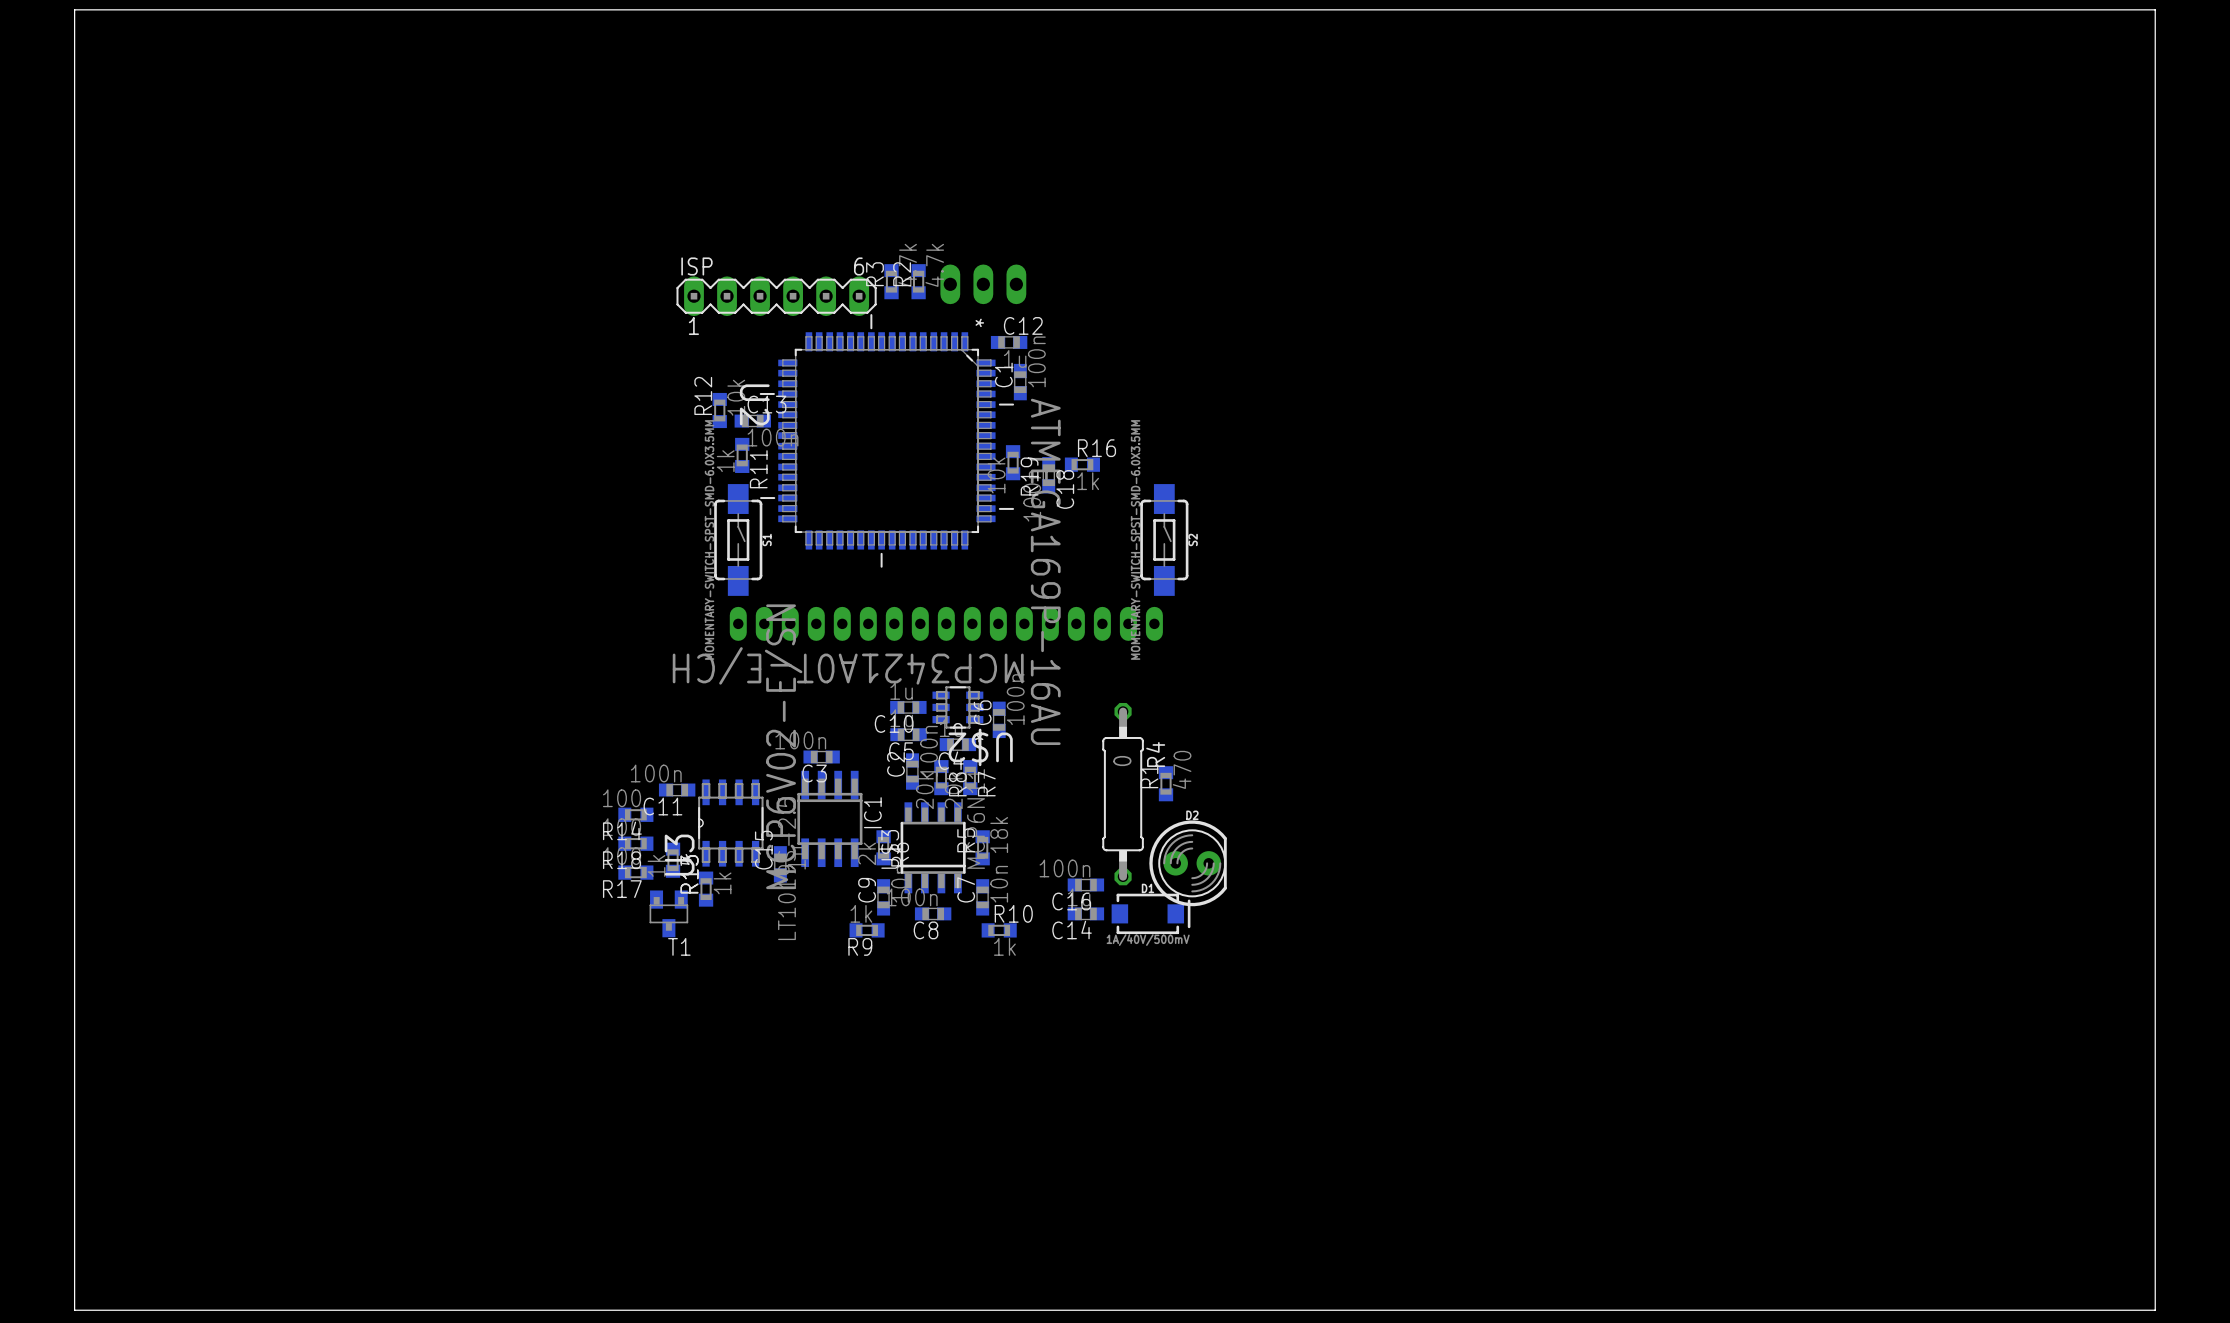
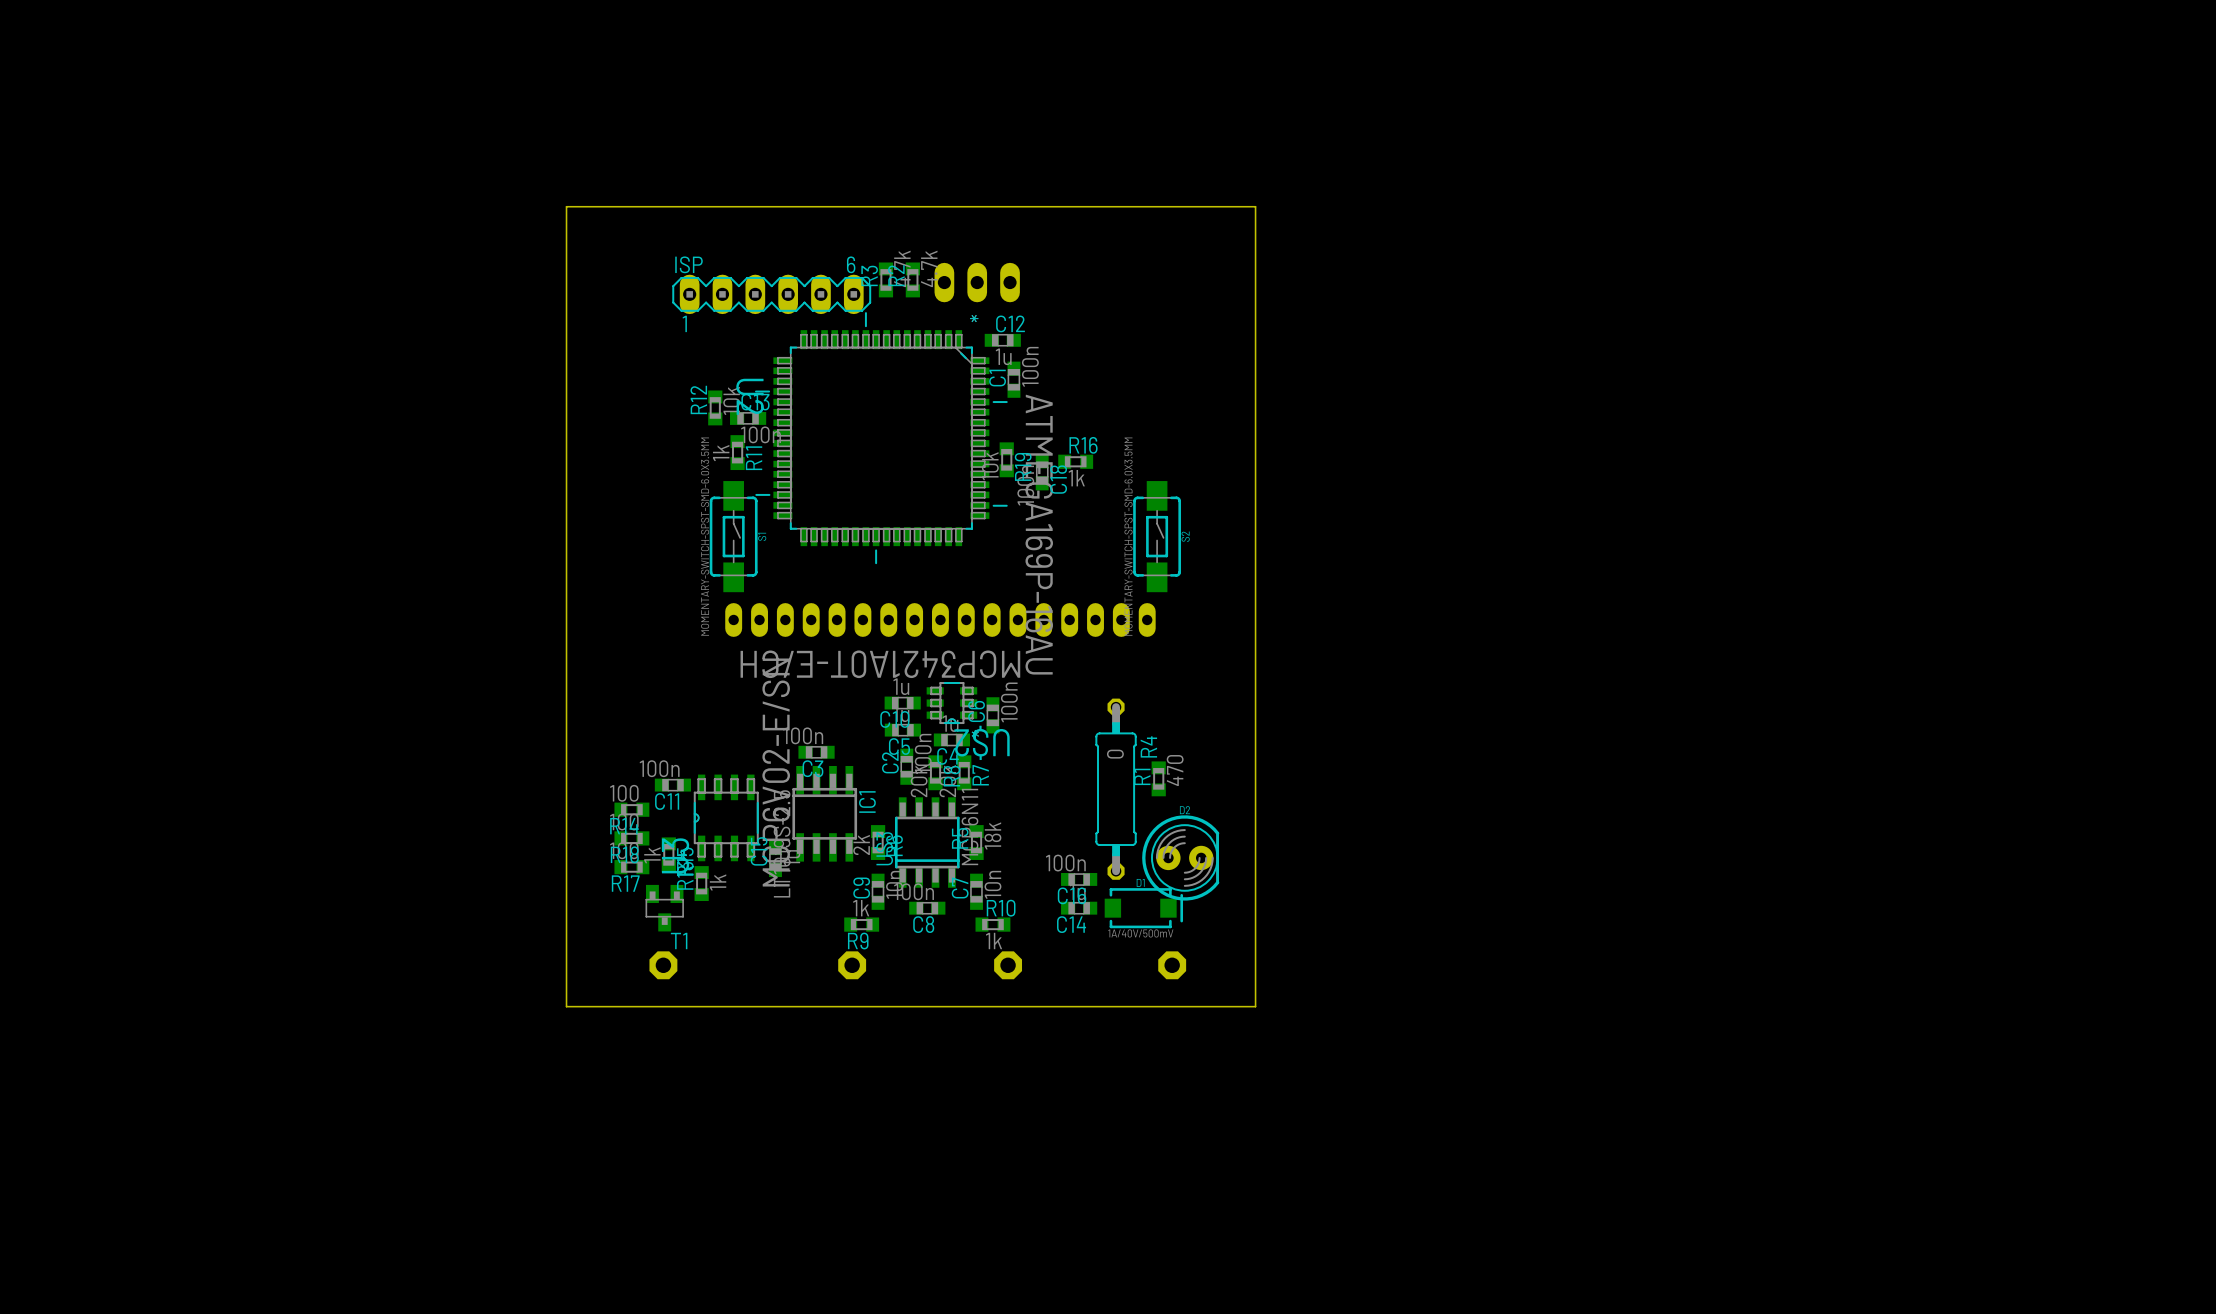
board edge: (2155, 9) (74, 9) (74, 1310) (2155, 1310) (2155, 9) -> none
board edge: none -> (1255, 206) (566, 206) (566, 1006) (1255, 1006) (1255, 206)
part: none -> (663, 965)
part: none -> (852, 965)
part: none -> (1008, 965)
part: none -> (1172, 965)

